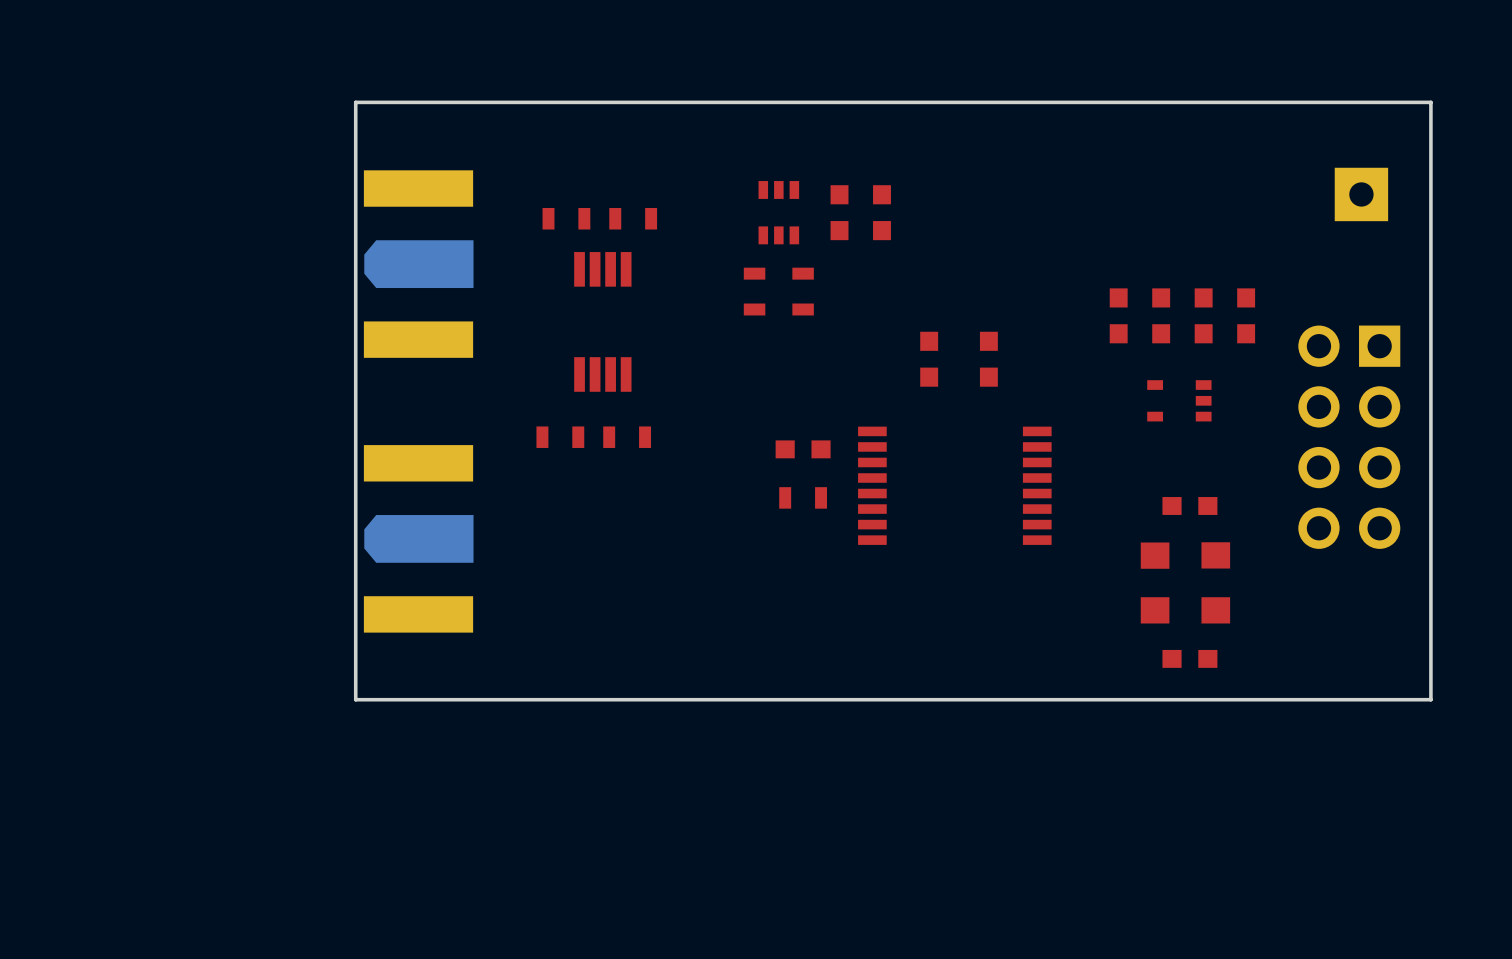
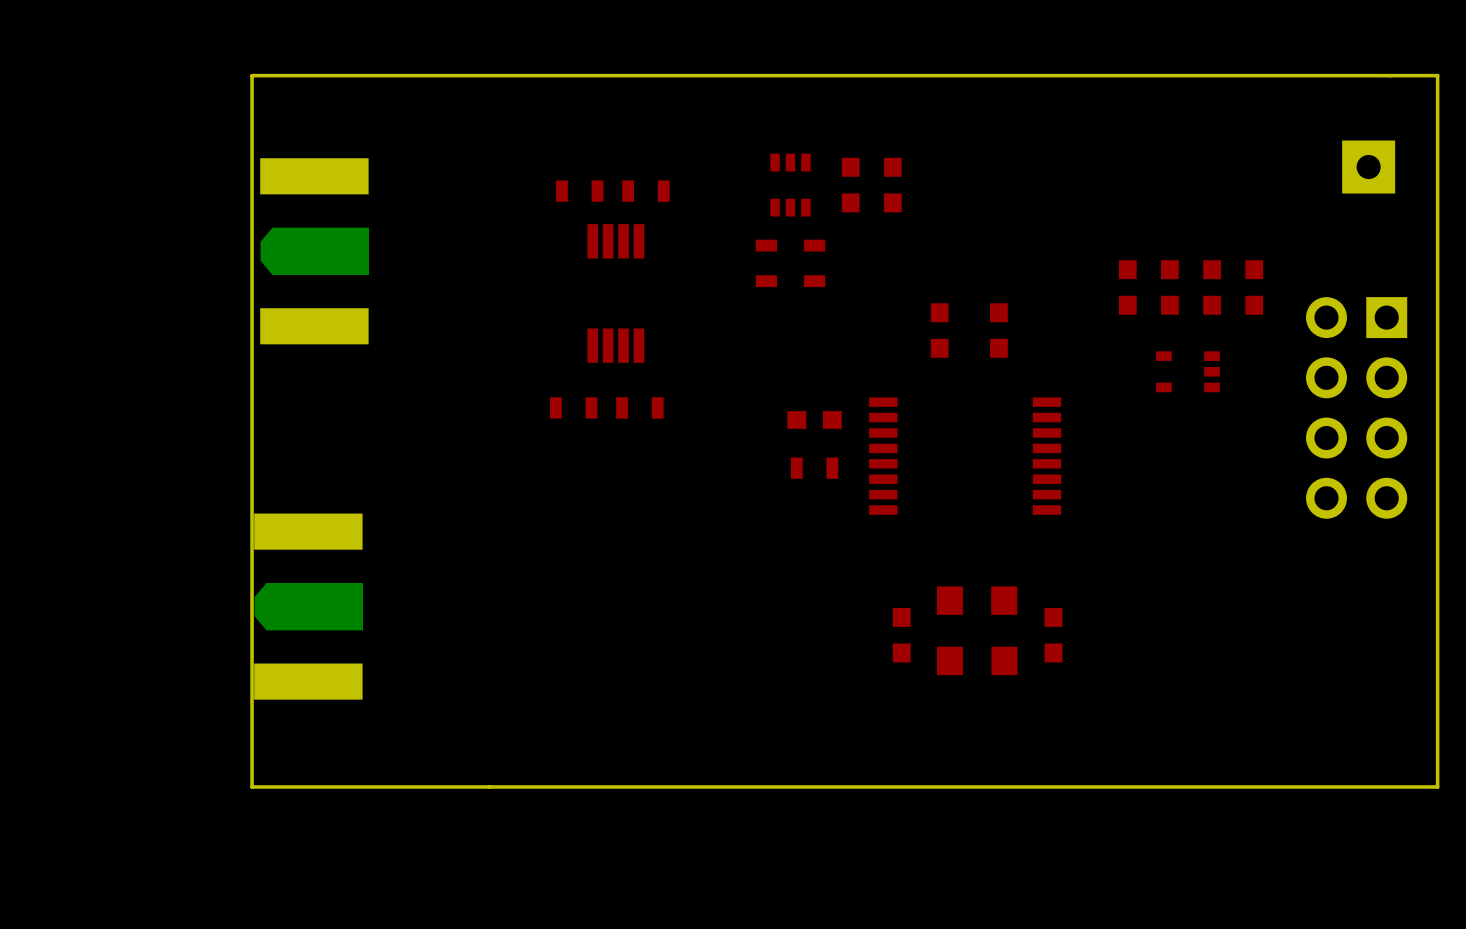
board edge: (355, 102) (355, 699) (1430, 699) -> (370, 75) (252, 75) (252, 786) (1437, 786) (1437, 668)
part position: (418, 264) -> (314, 251)
part: (1189, 505) -> none
part: (418, 538) -> none
part rotation: 0° (1185, 582) -> 90° clockwise (977, 630)
part position: (1185, 582) -> (977, 630)
part: none -> (308, 606)
part: (1189, 658) -> none
part: none -> (901, 635)
part: none -> (1053, 635)

